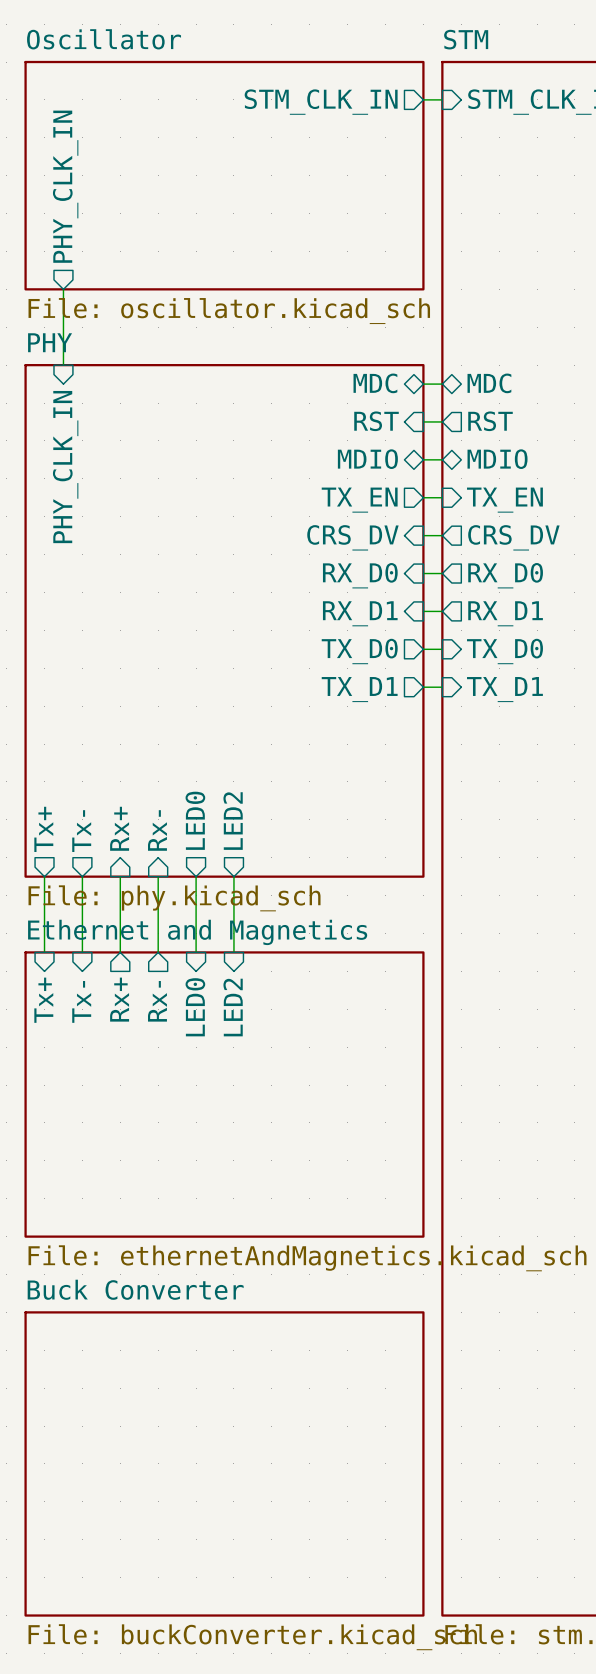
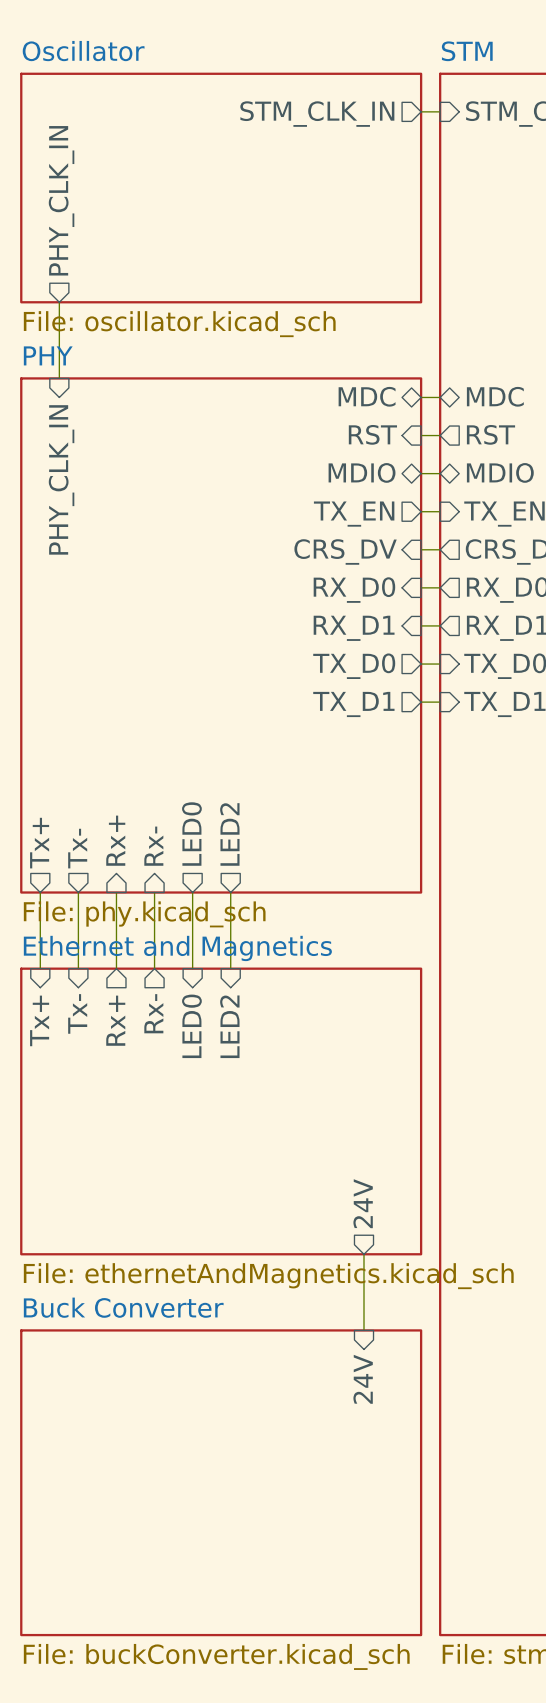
sheet pin: none -> 24V (363, 1203)
wire: none -> (363, 1254) (363, 1330)
sheet pin: none -> 24V (363, 1379)

